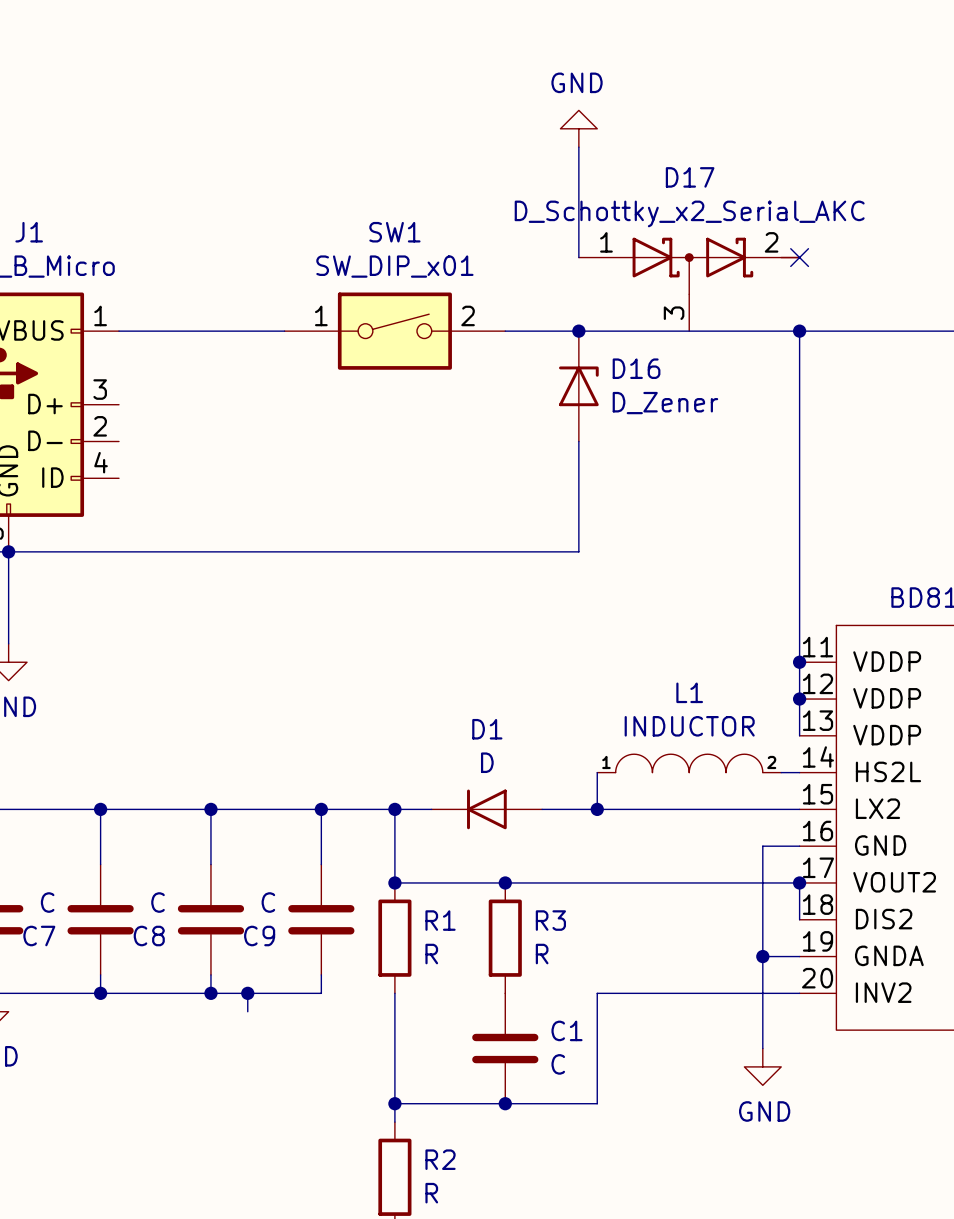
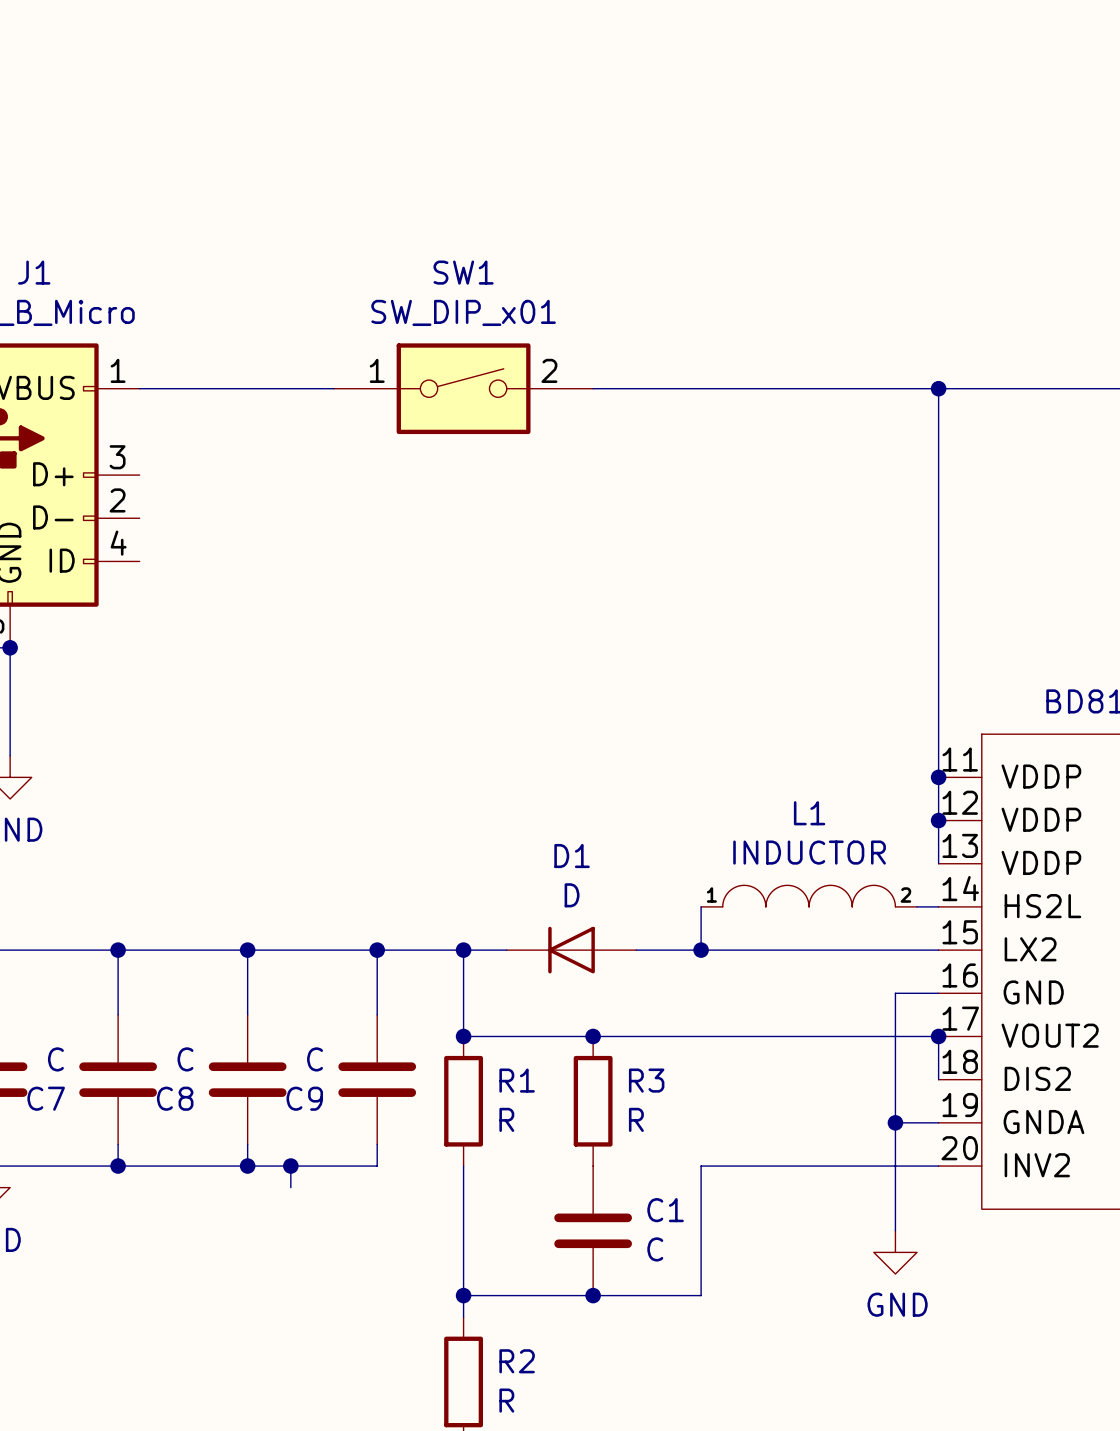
power symbol: GND (578, 128) -> none
wire: (578, 147) (578, 257) -> none
no-connect mark: (799, 257) -> none
D17: D_Schottky_x2_Serial_AKC (689, 284) -> none
junction: (578, 331) -> none
D16: D_Zener (578, 386) -> none
wire: (578, 441) (578, 551) (8, 551) -> none

